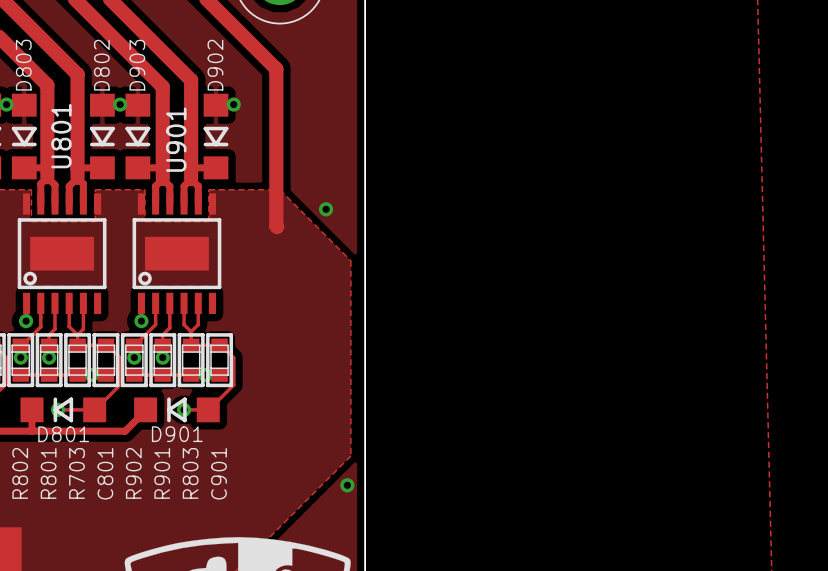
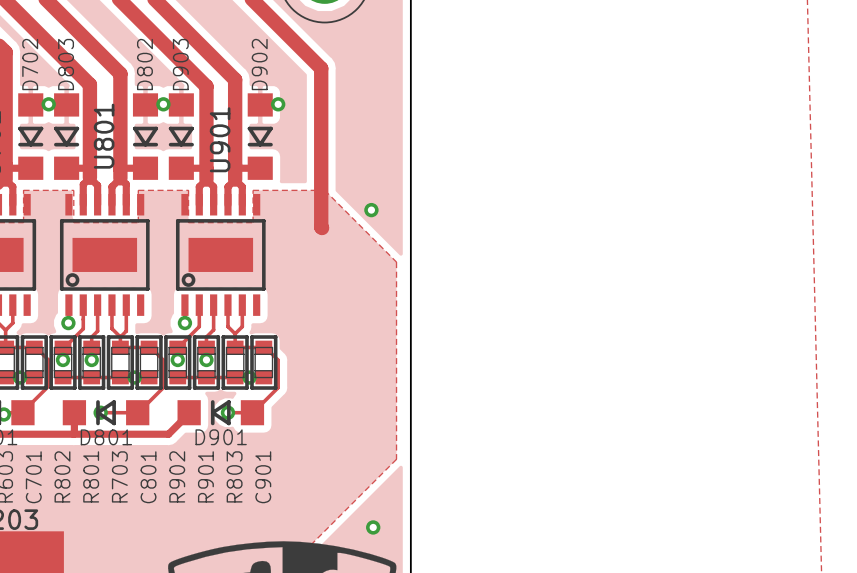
via position: (347, 485) -> (373, 527)

